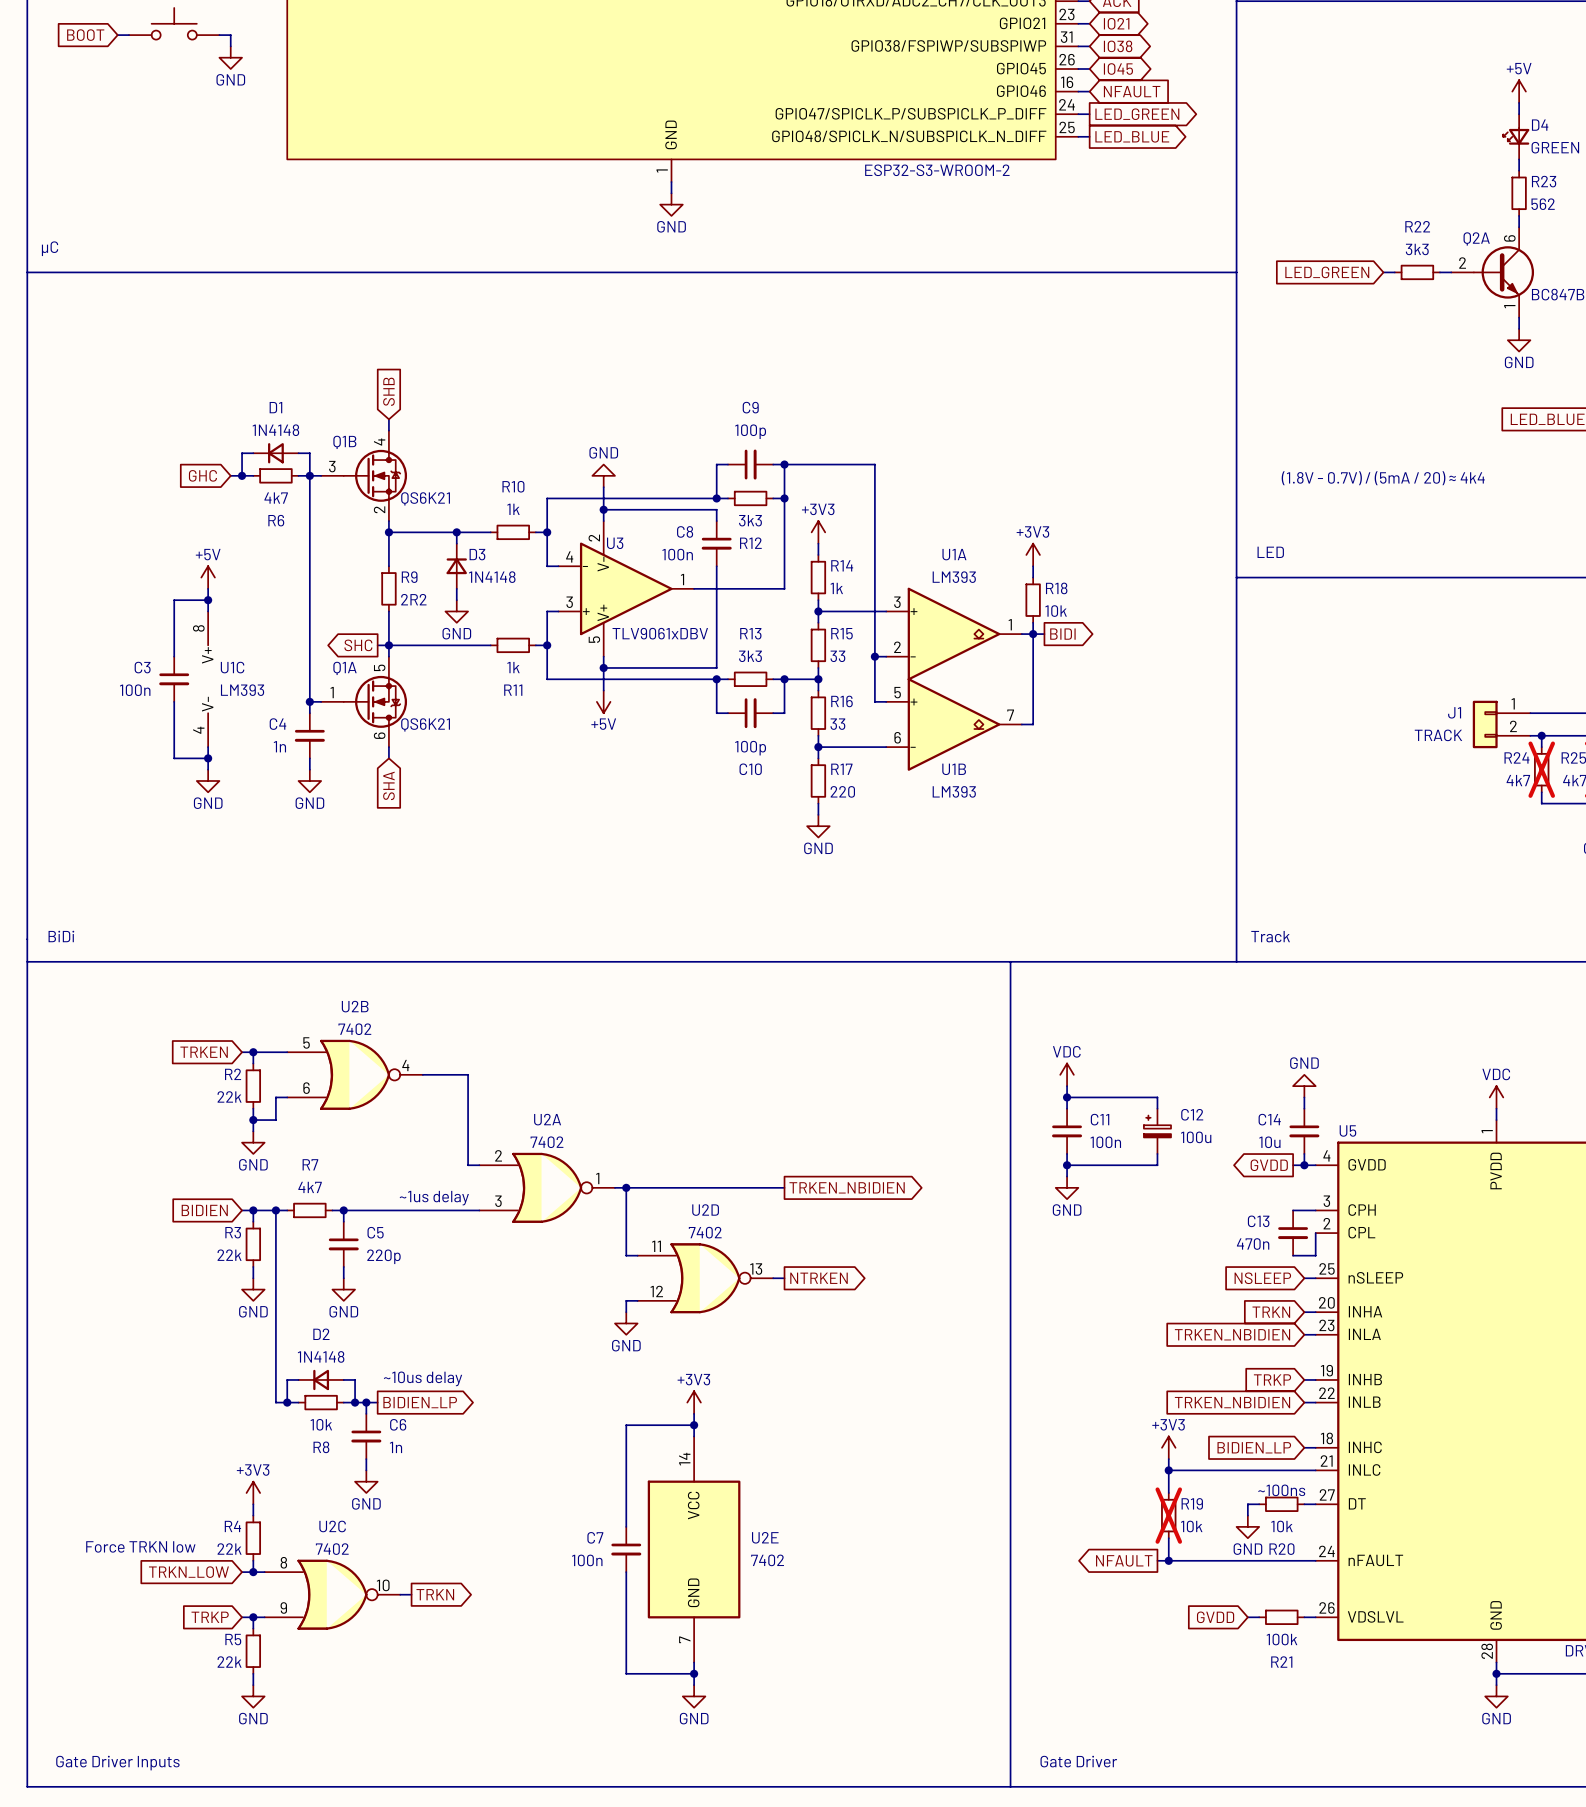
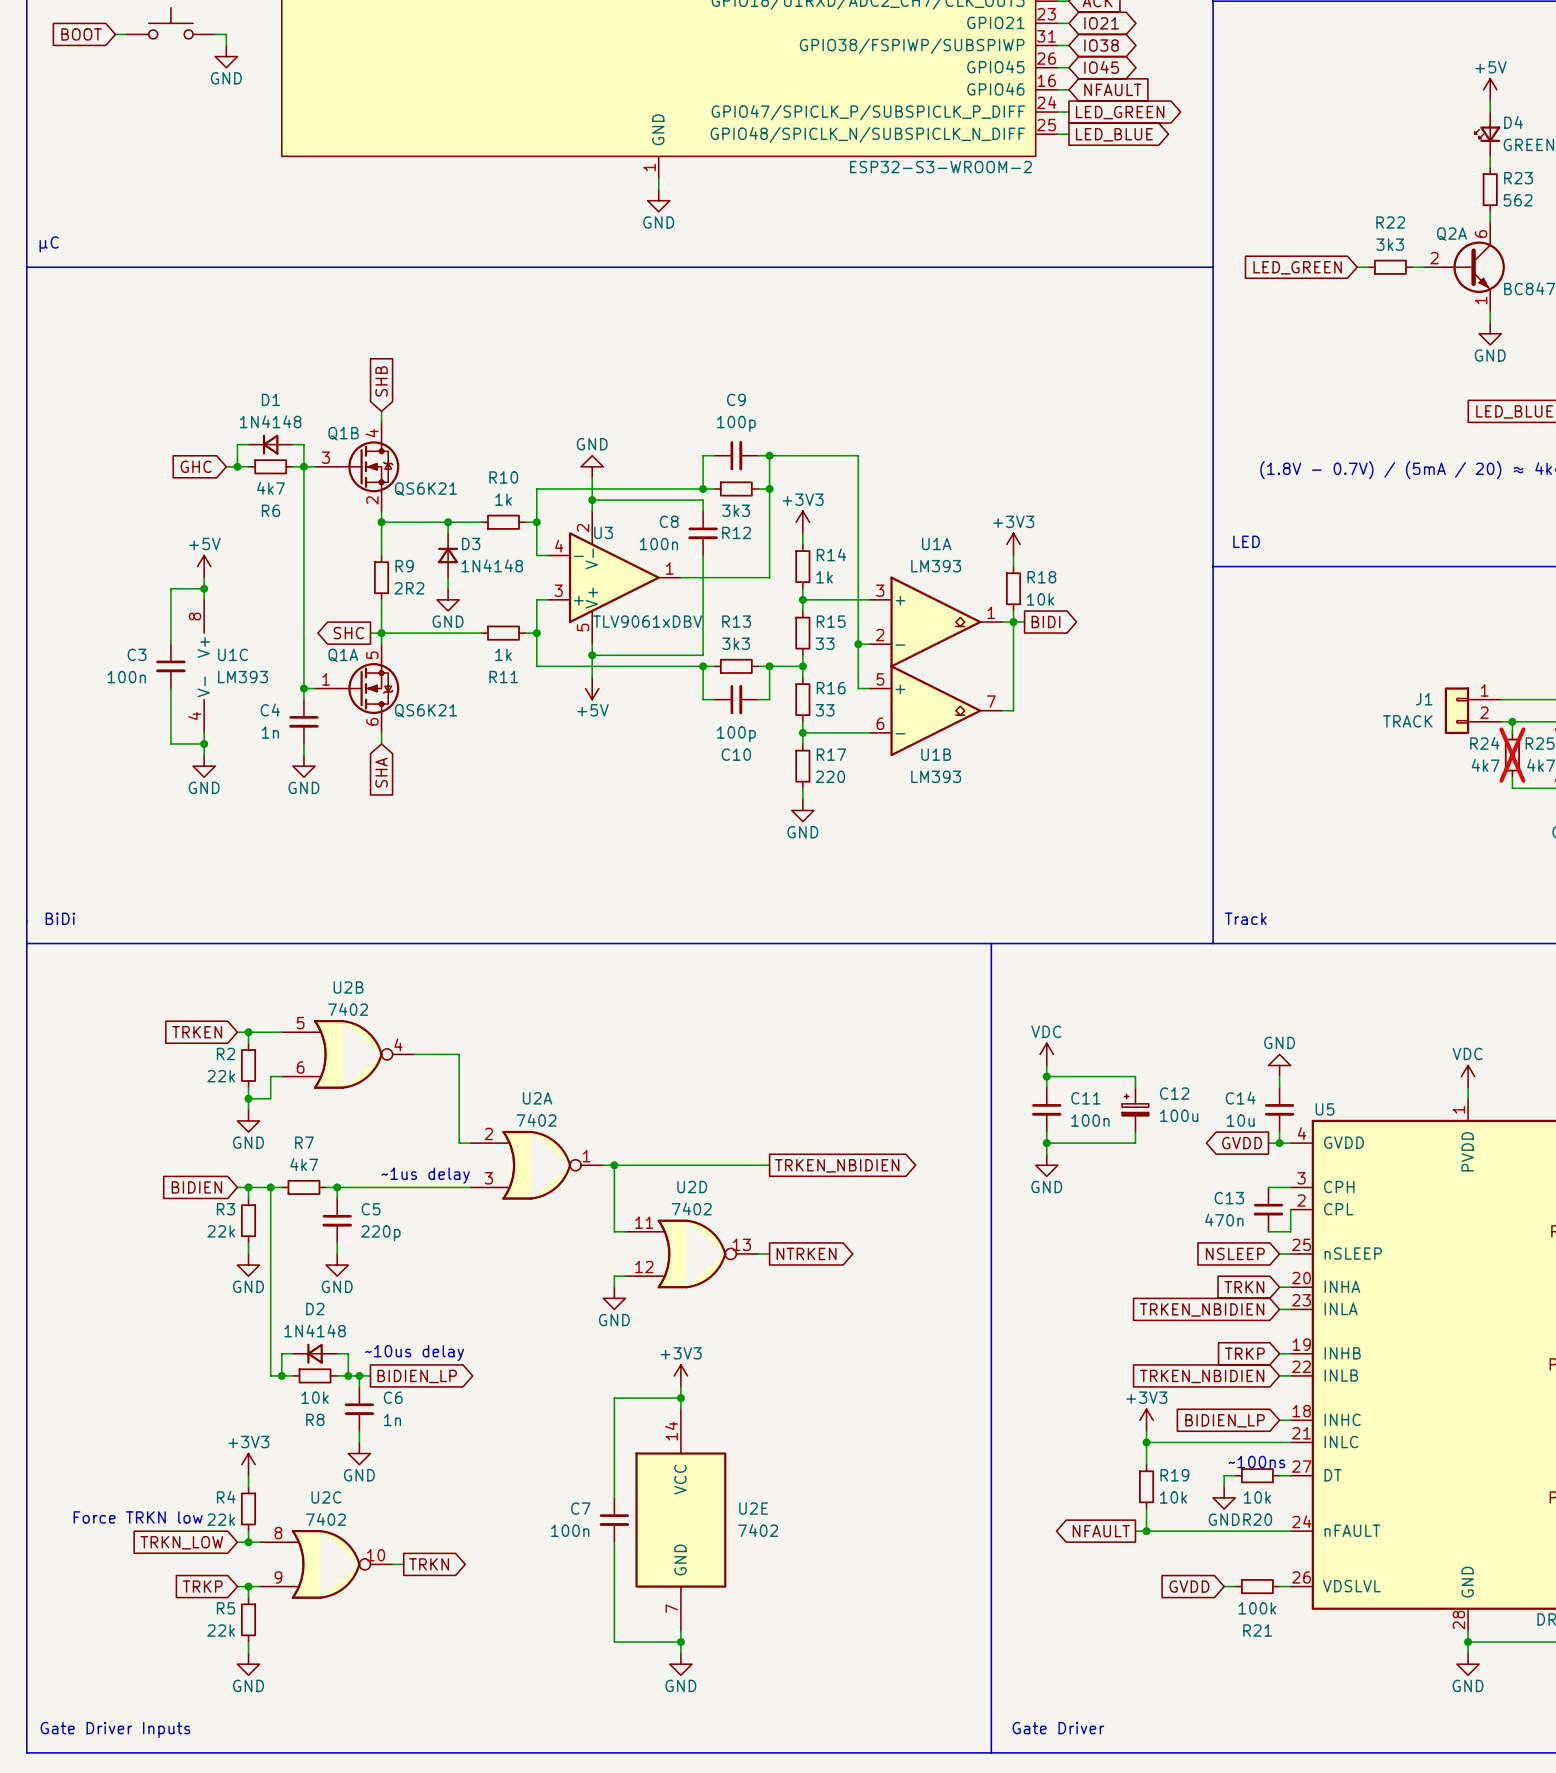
R19 do-not-place cross: (1168, 1515) -> none

